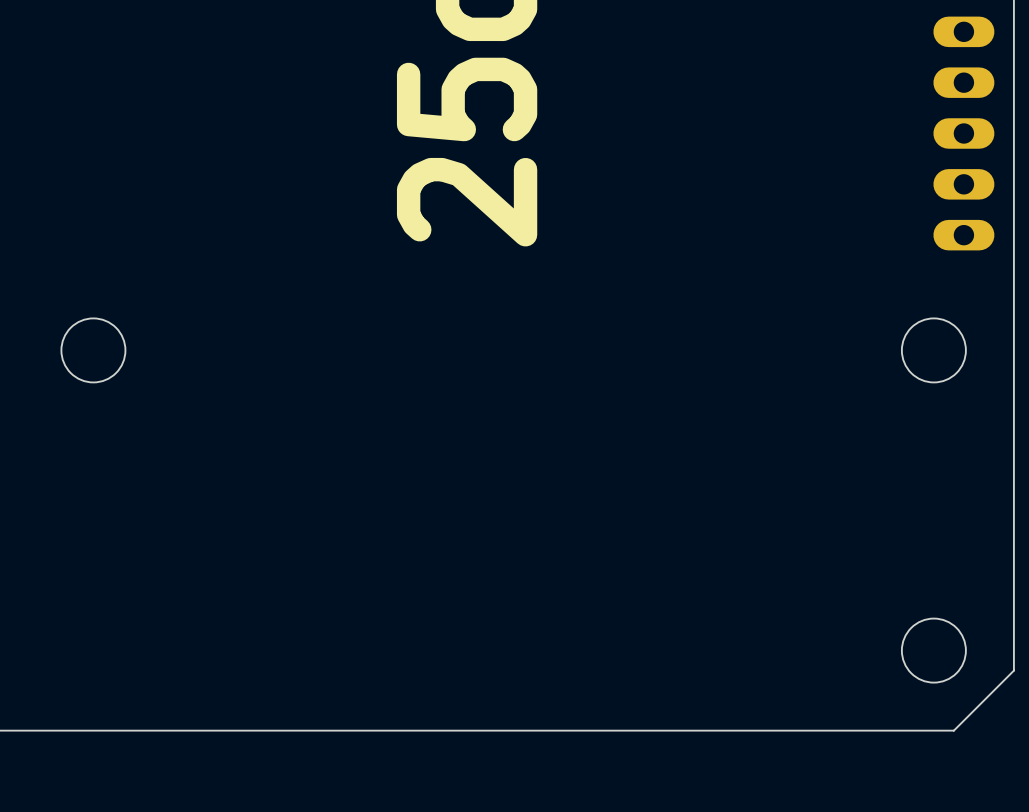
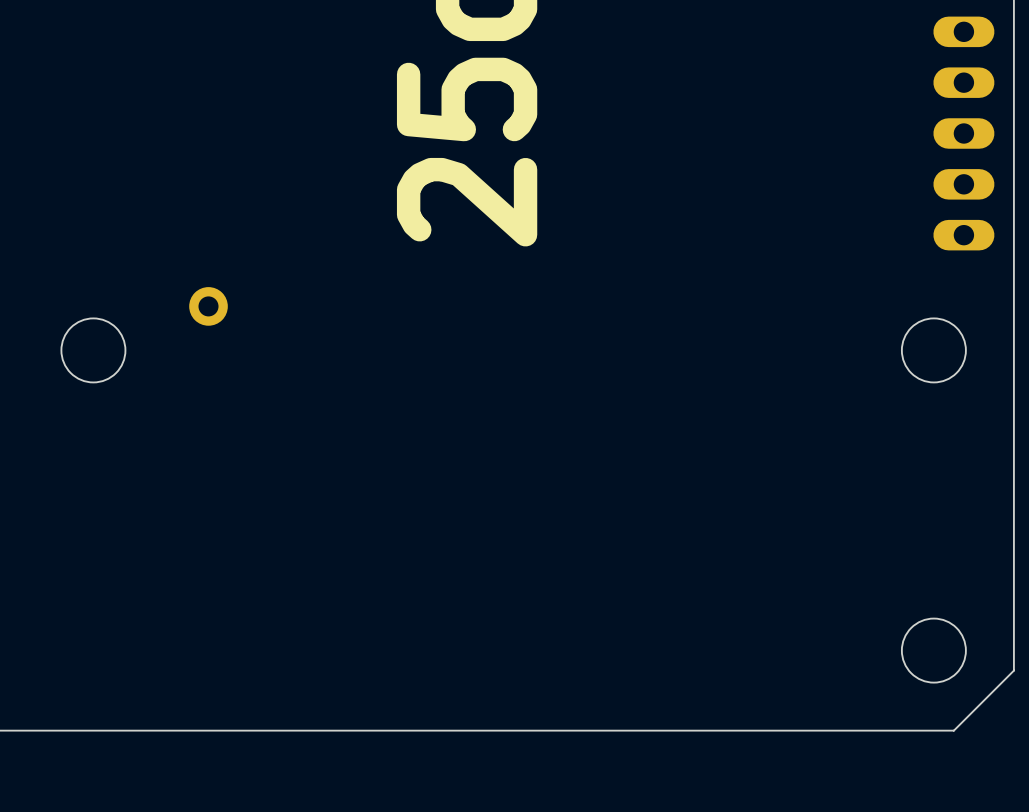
part: none -> (208, 306)

